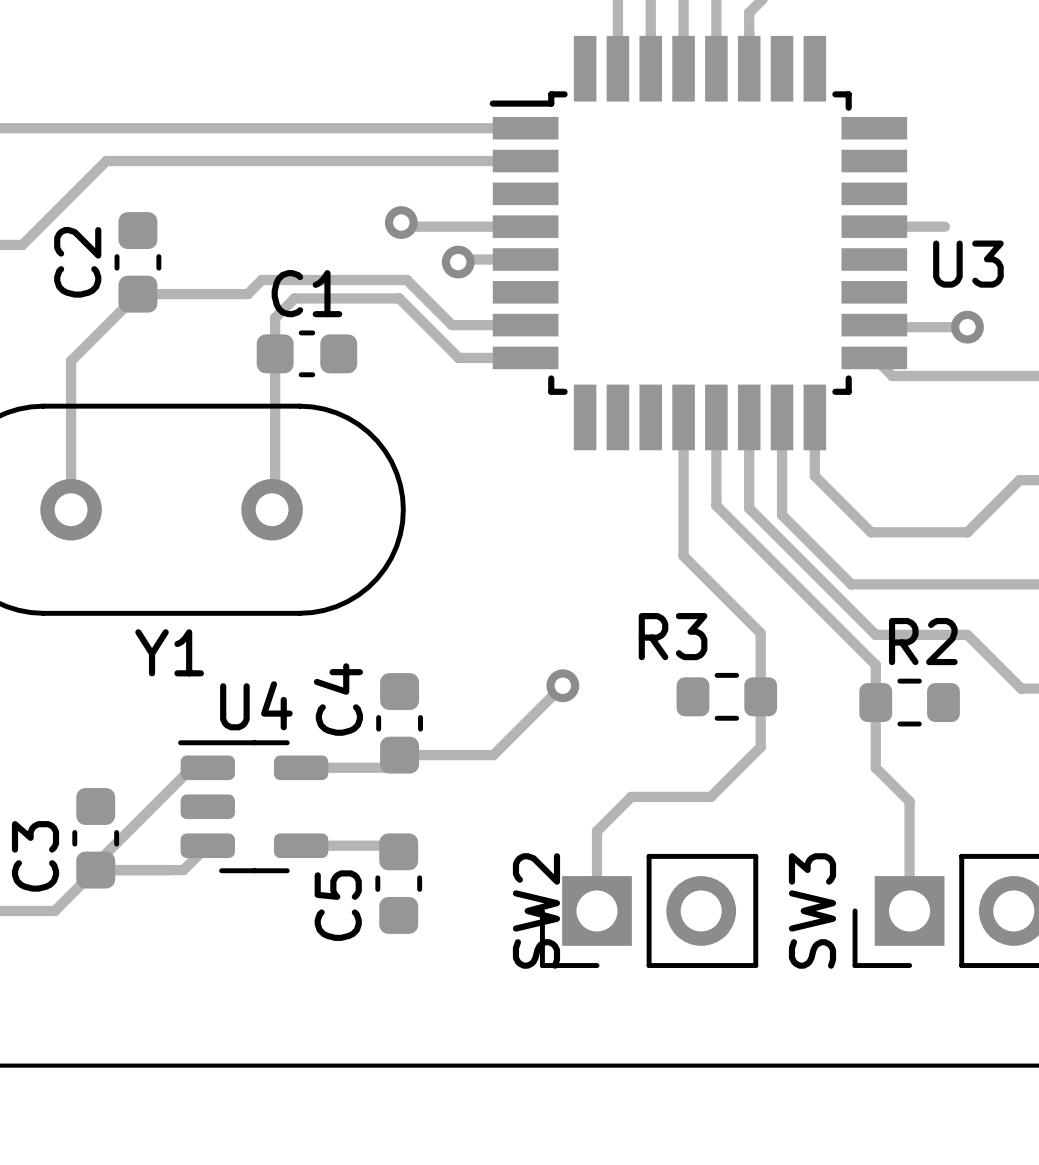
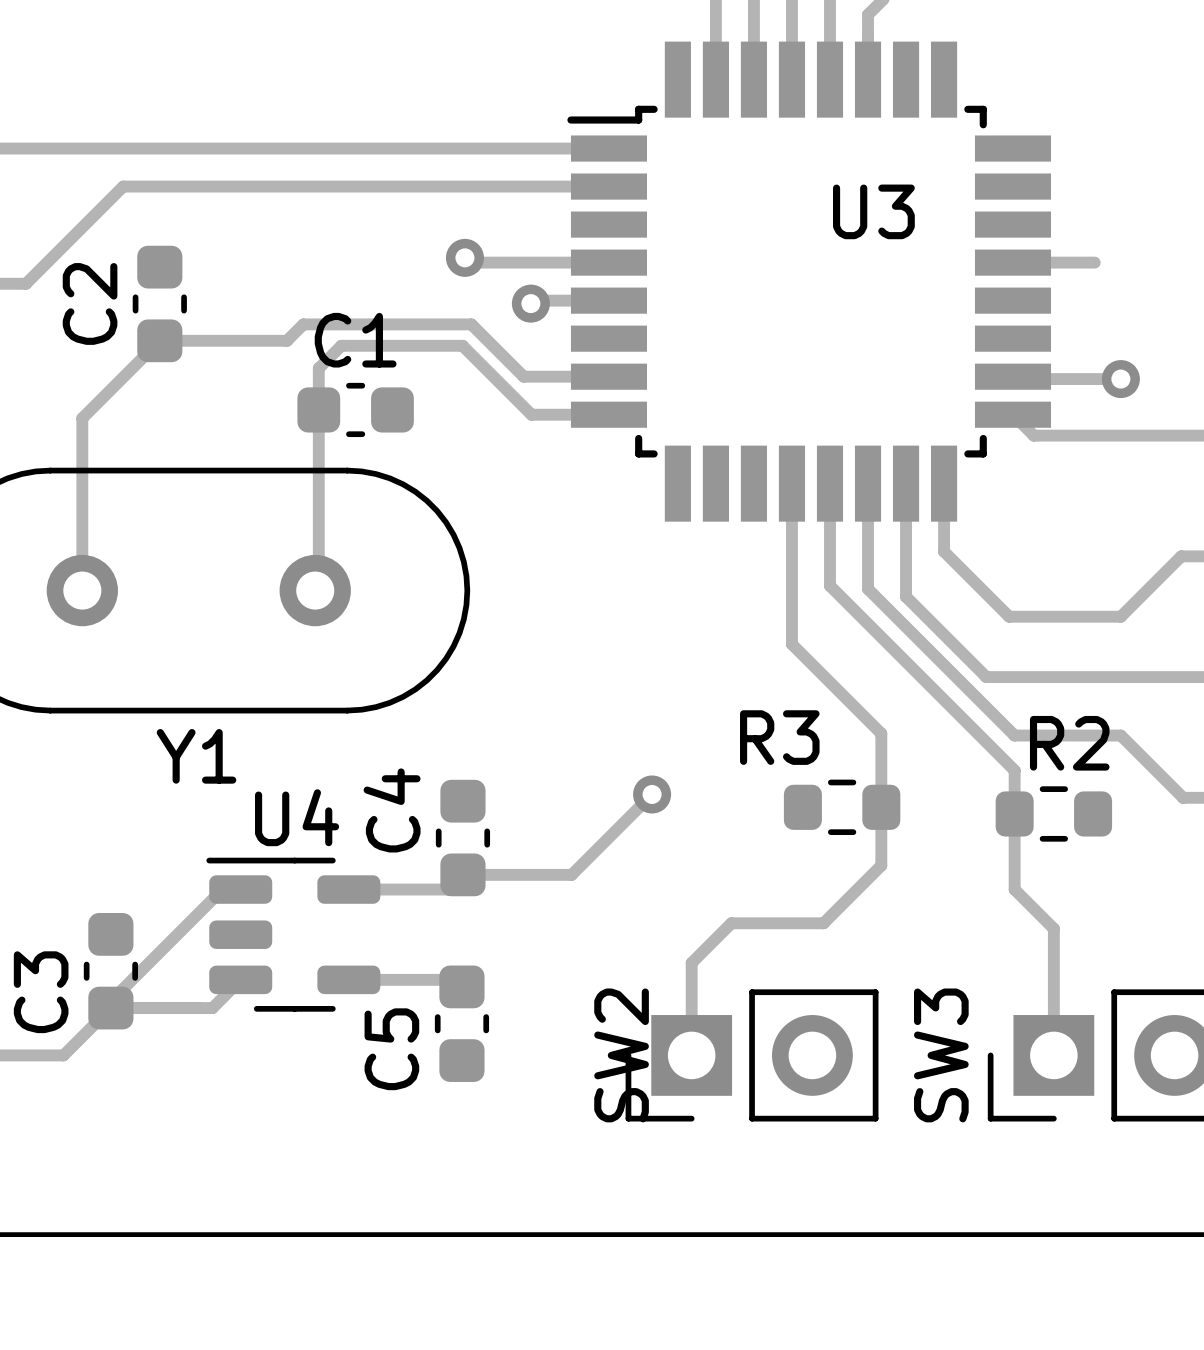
U3 name position: U3 (968, 264) -> U3 (873, 211)

